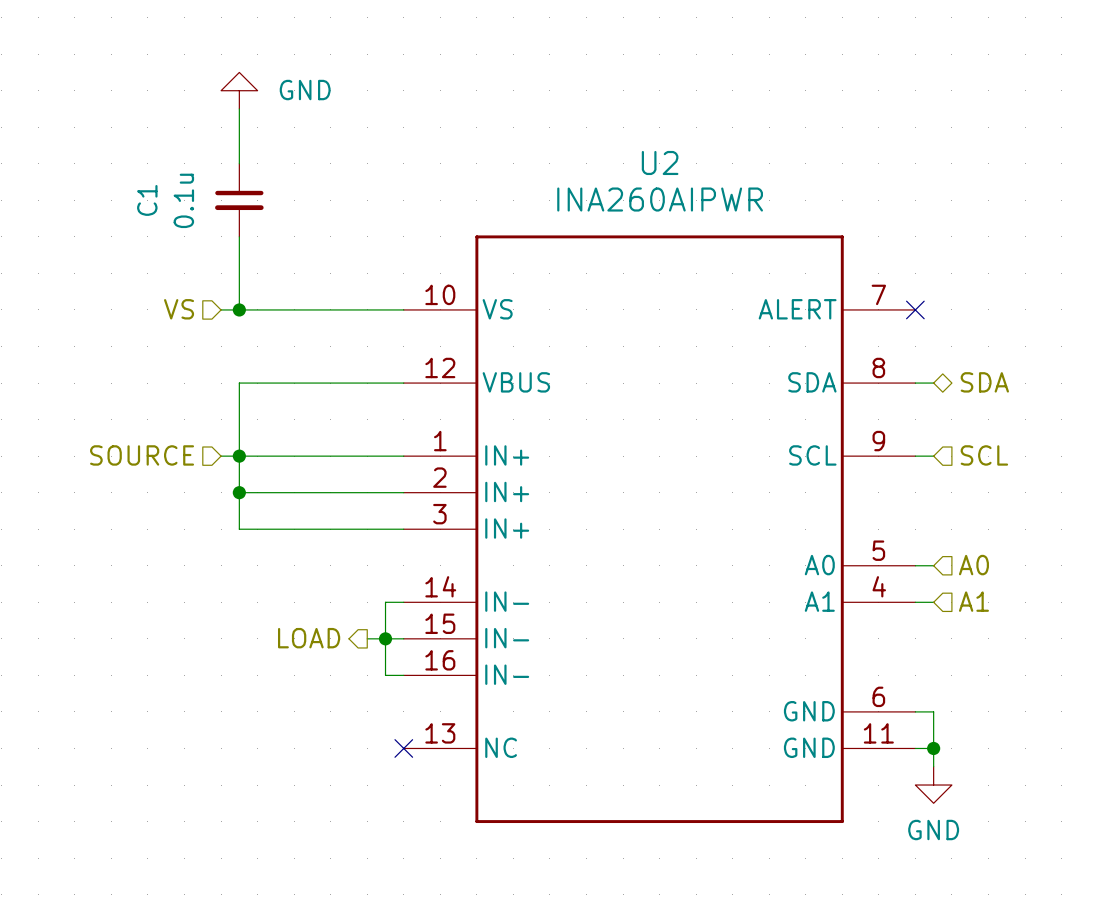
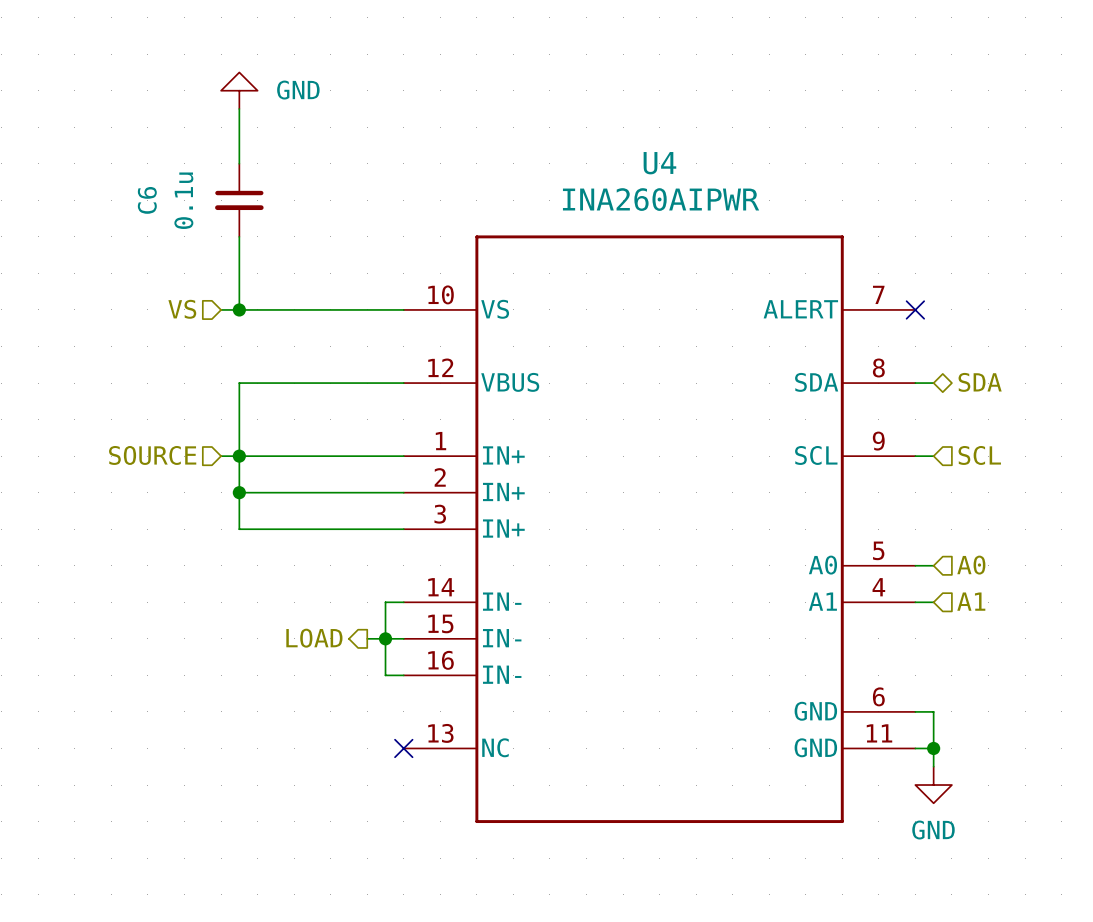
U2 name: U2 (660, 162) -> U4 (659, 163)
C1 name: C1 (147, 200) -> C6 (147, 200)

